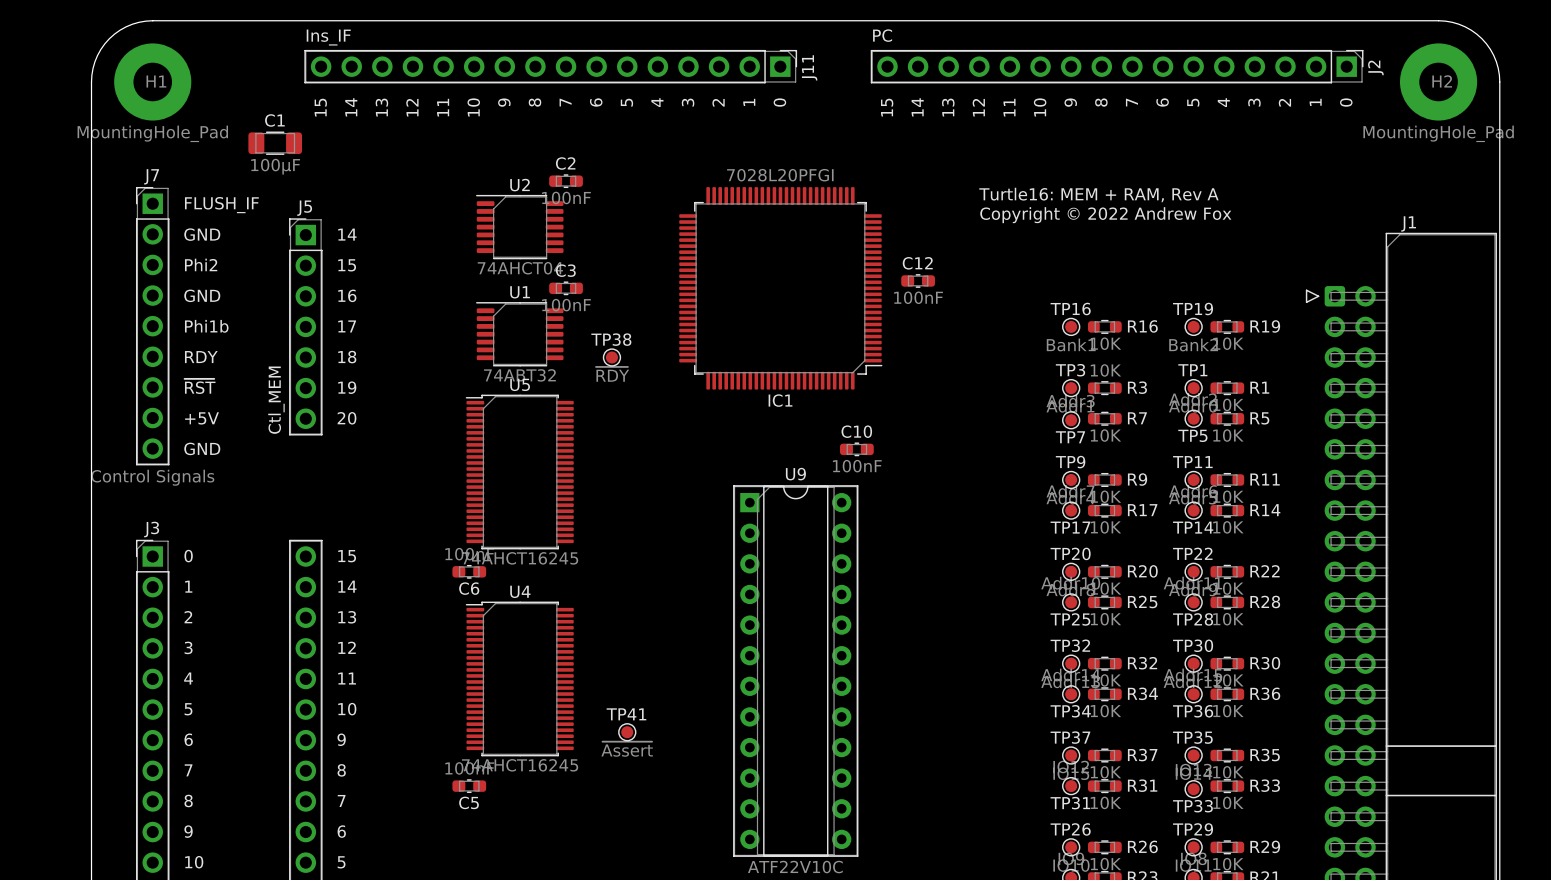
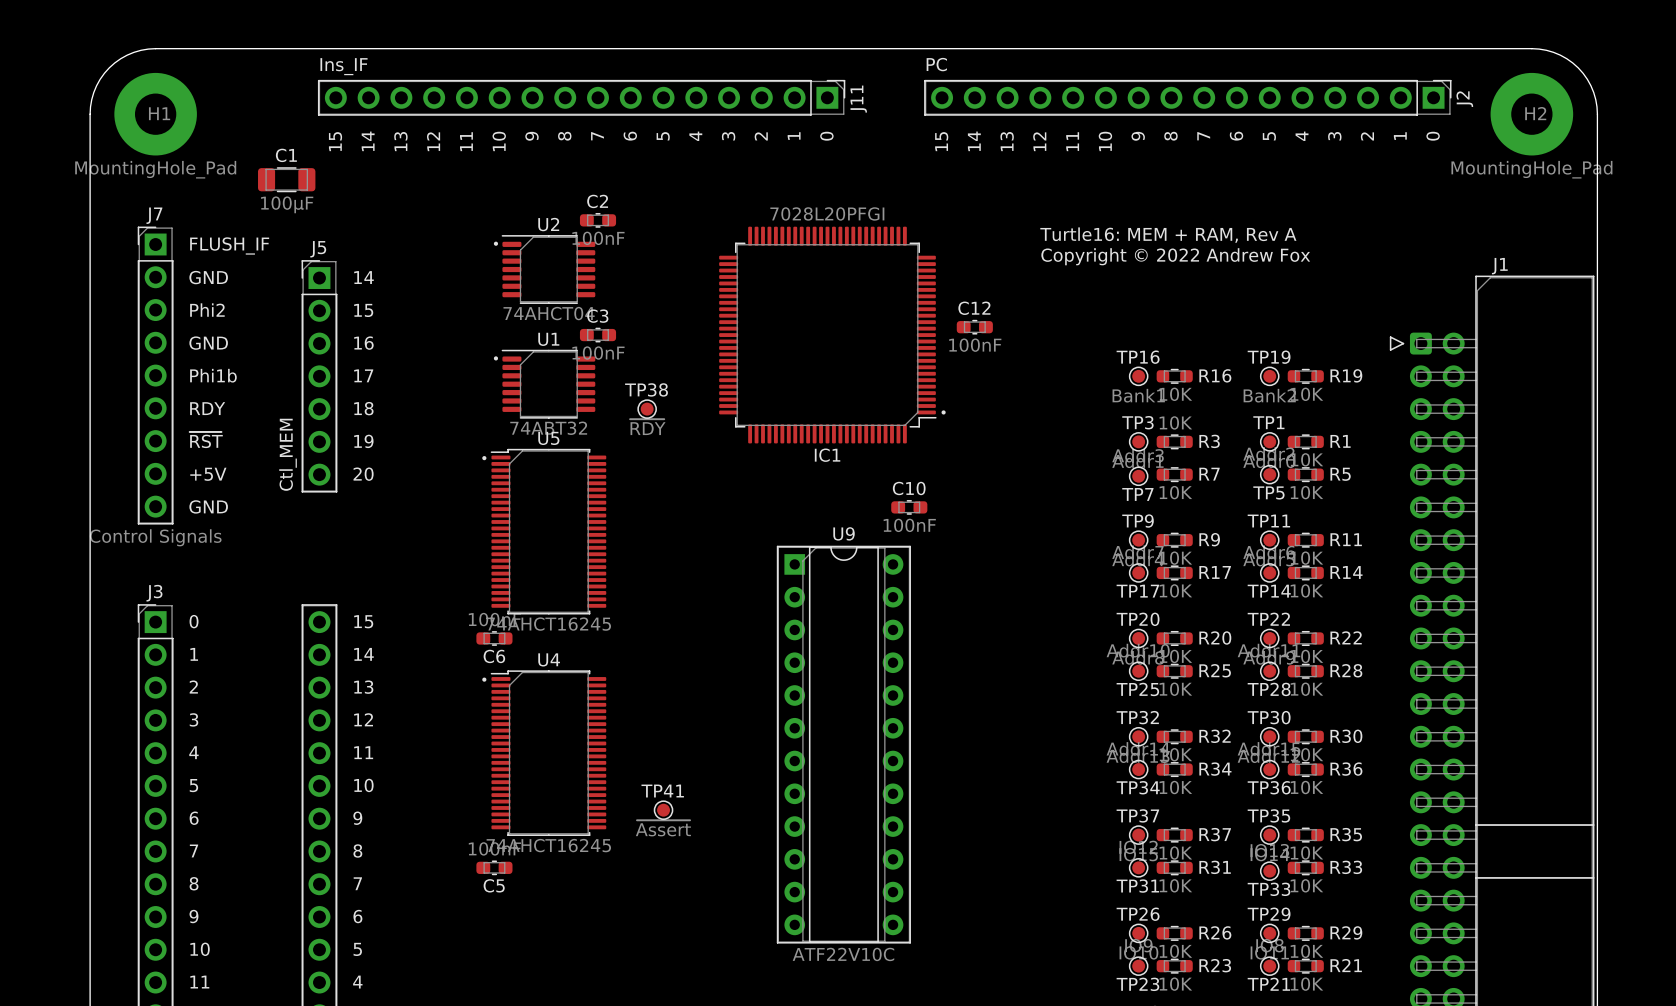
IC1 footprint: [679, 187, 883, 390] -> [719, 226, 946, 444]
U2 footprint: [476, 194, 564, 260] -> [493, 235, 596, 304]
U1 footprint: [476, 302, 564, 367] -> [493, 349, 596, 419]
U5 footprint: [465, 394, 574, 550] -> [482, 448, 607, 615]
U4 footprint: [465, 601, 574, 757] -> [482, 670, 607, 836]

